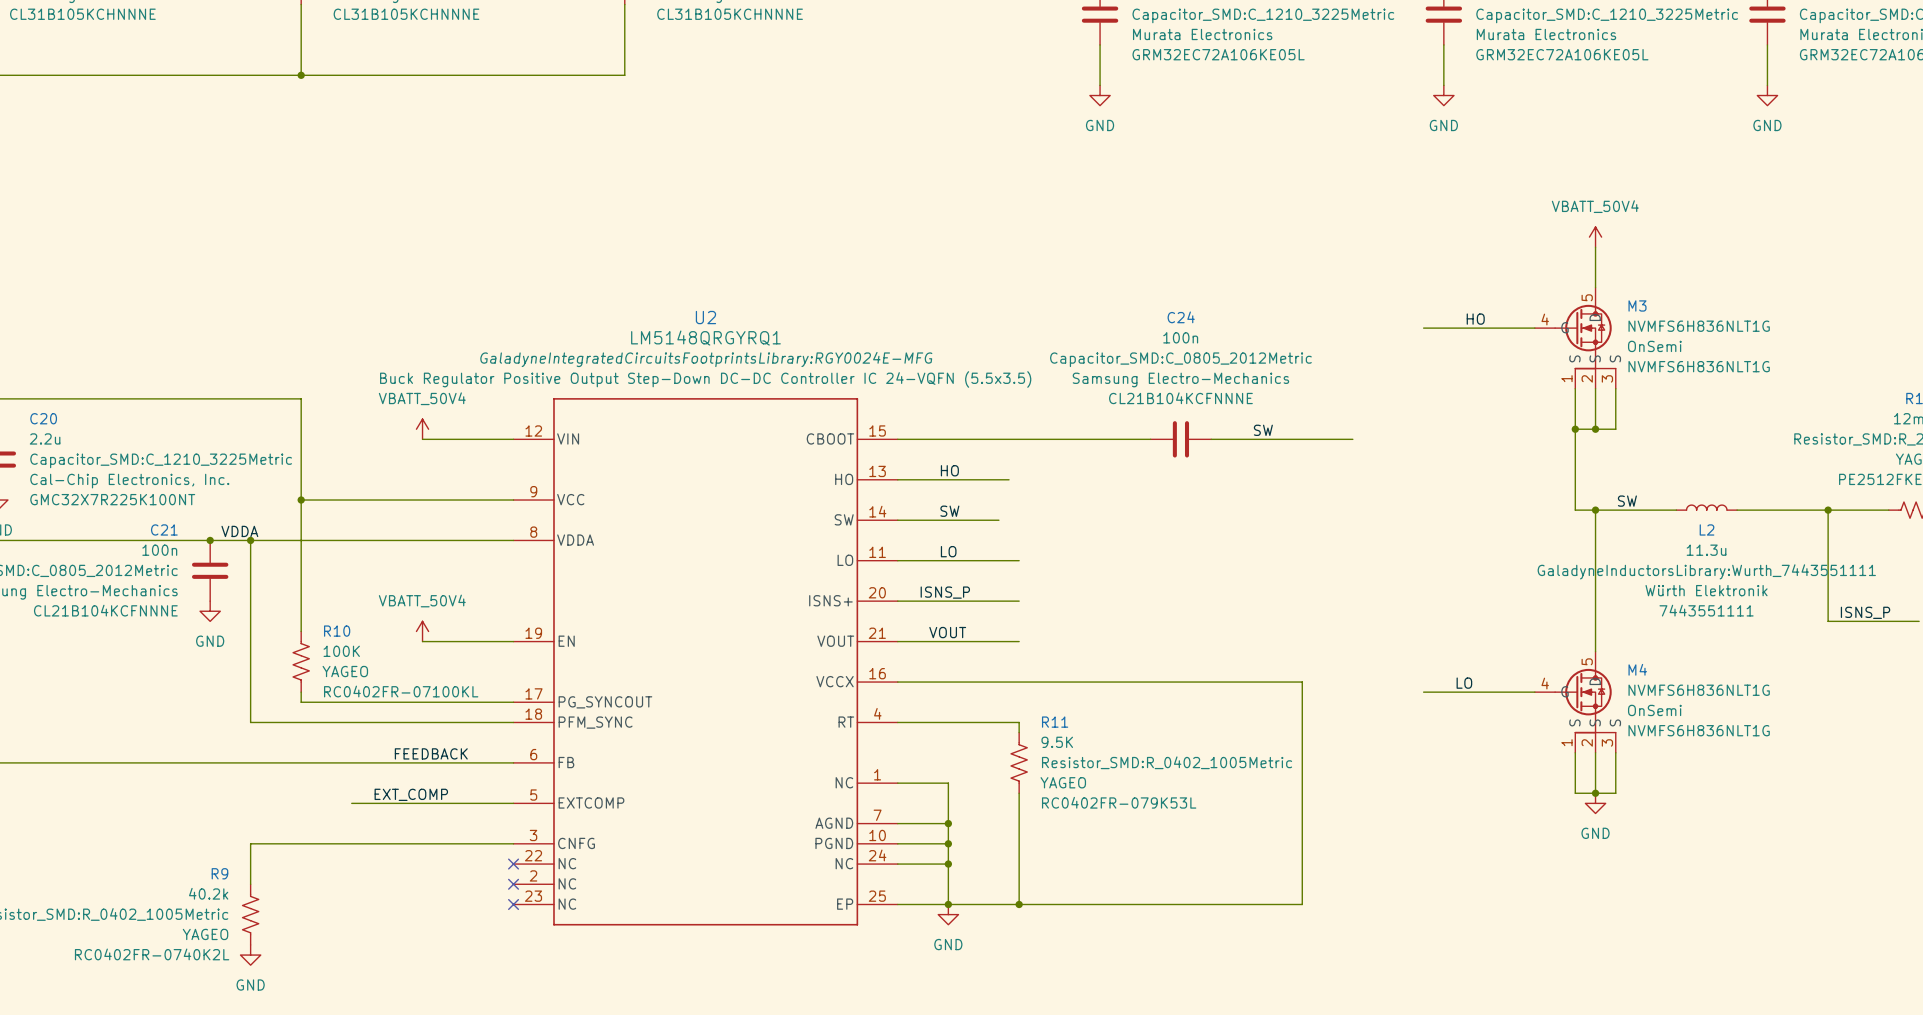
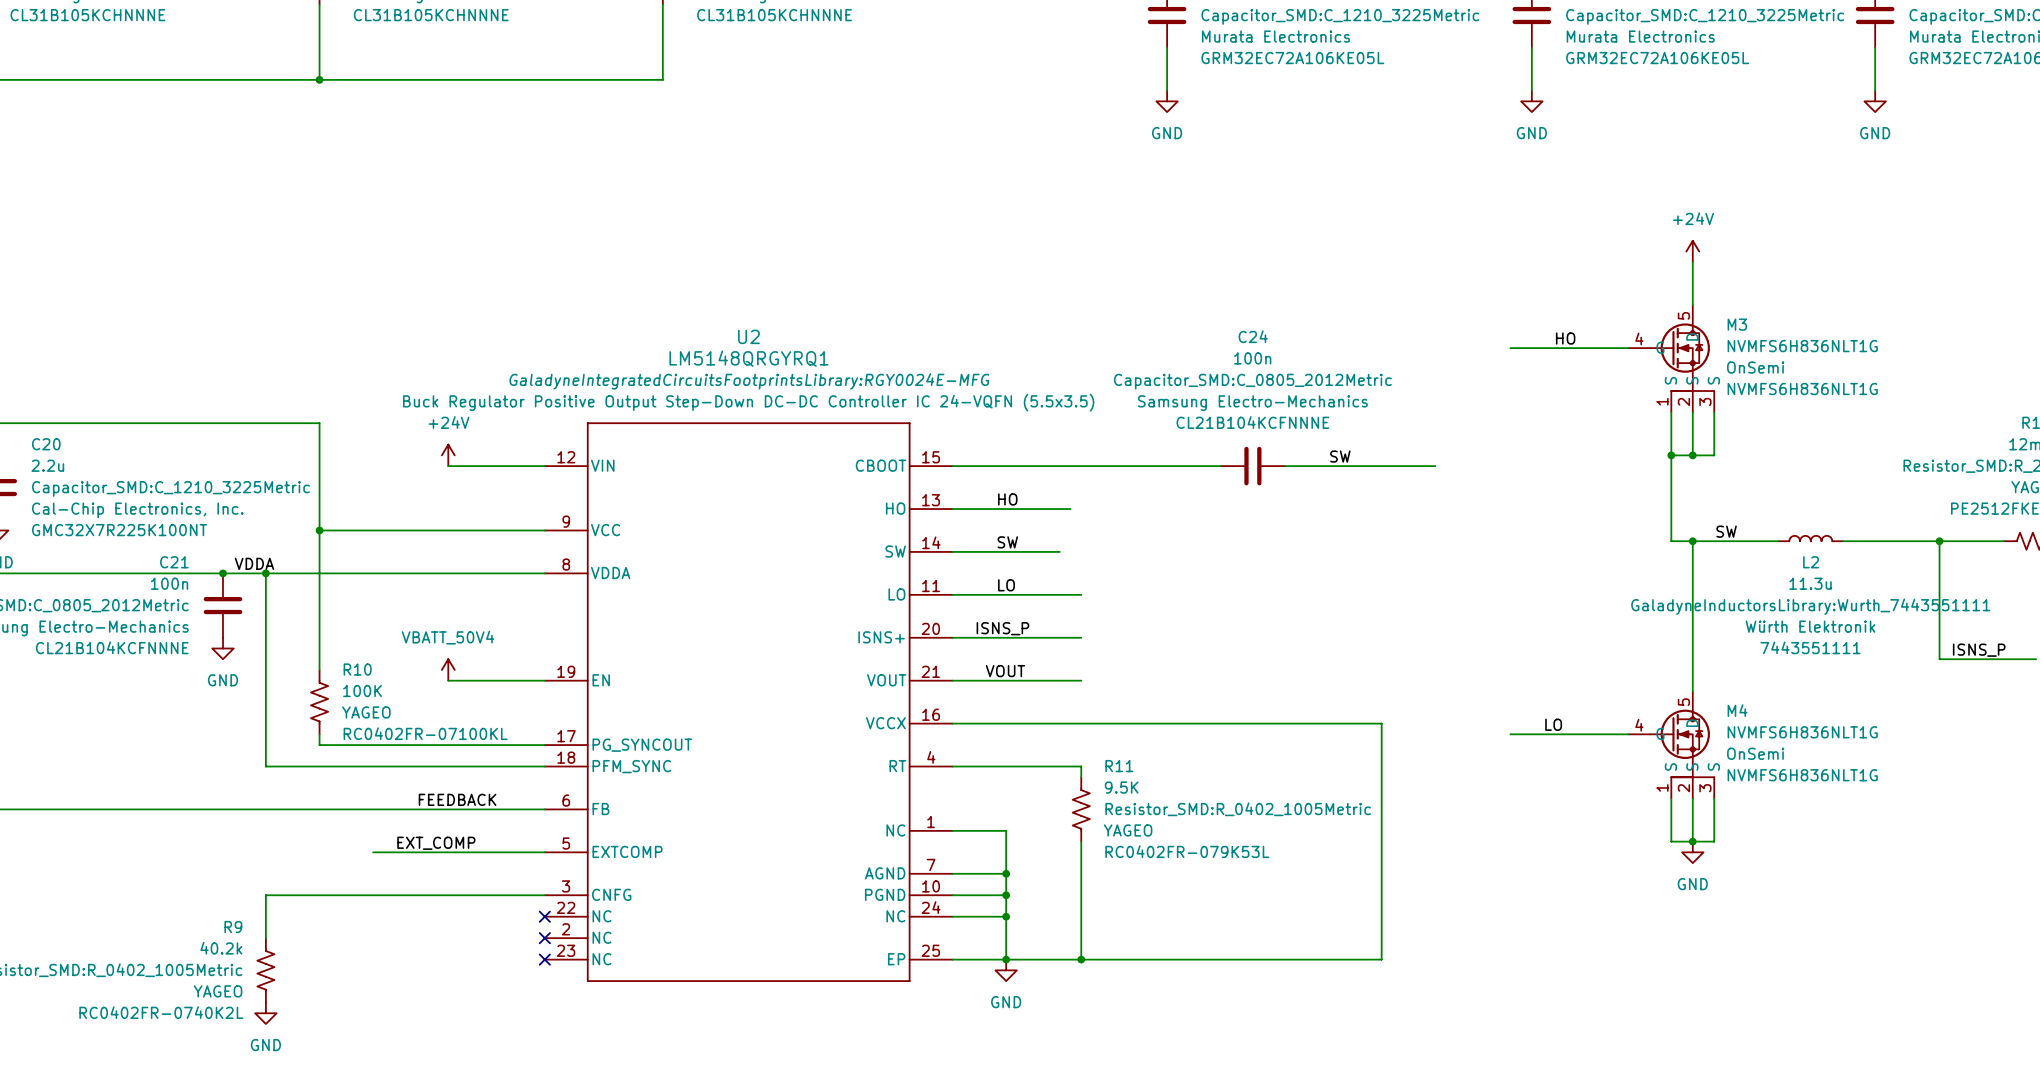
power symbol: VBATT_50V4 (1595, 237) -> +24V (1692, 251)
power symbol: VBATT_50V4 (422, 429) -> +24V (448, 455)

